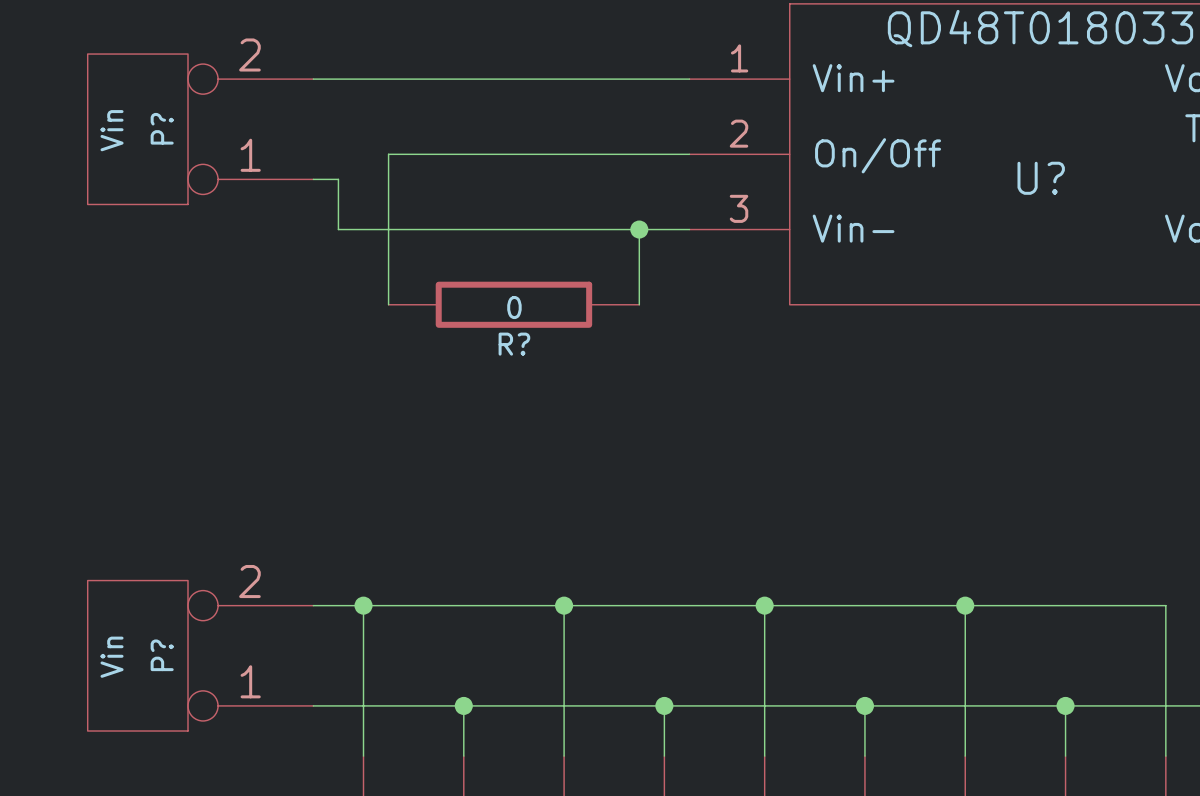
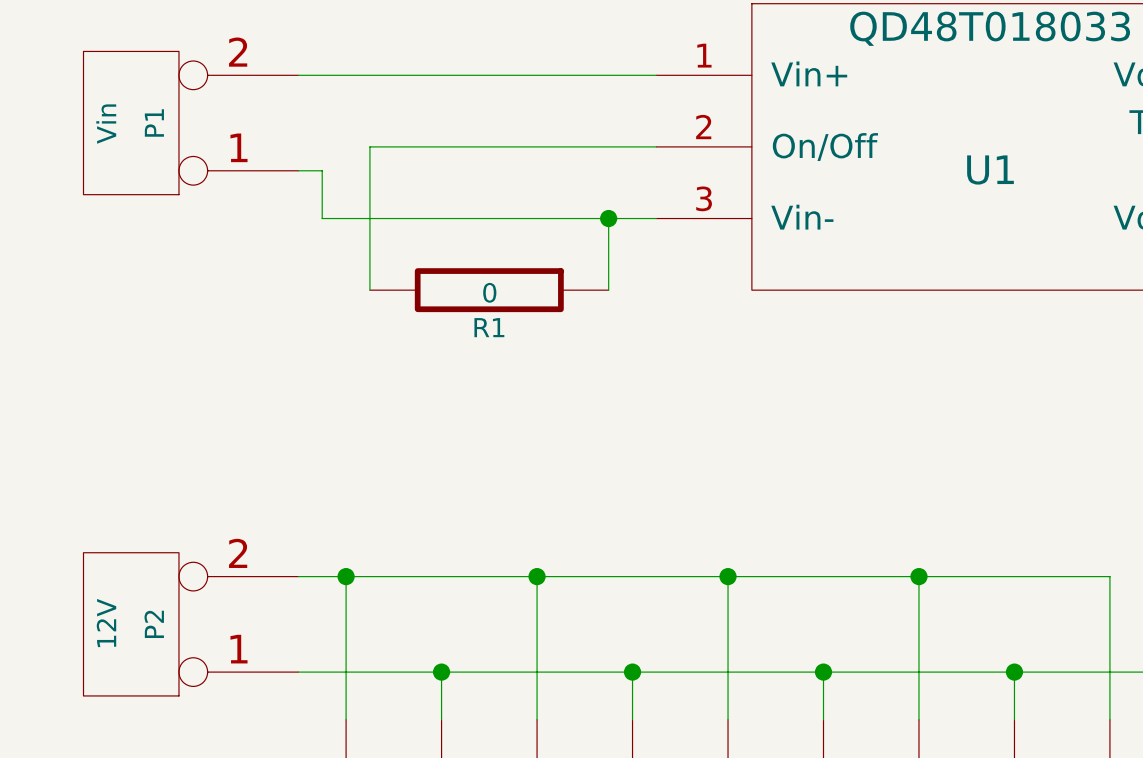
P? name: P? (162, 128) -> P1 (154, 122)
U? name: U? (1041, 178) -> U1 (990, 170)
R? name: R? (514, 344) -> R1 (489, 327)
P? name: P? (162, 655) -> P2 (154, 624)
P? value: Vin (112, 657) -> 12V (106, 623)

